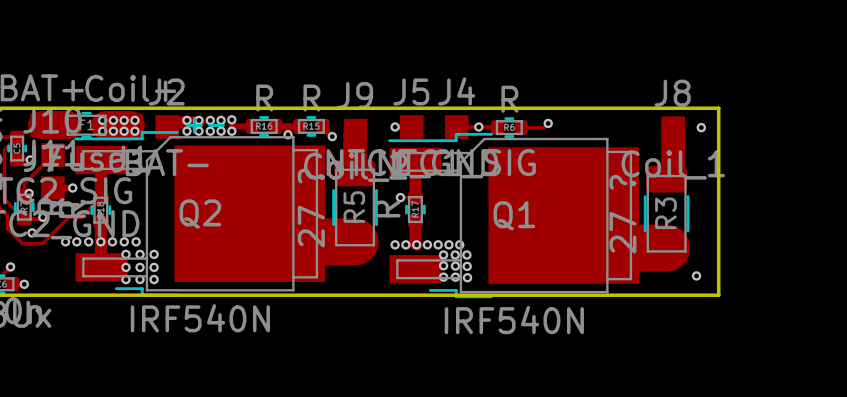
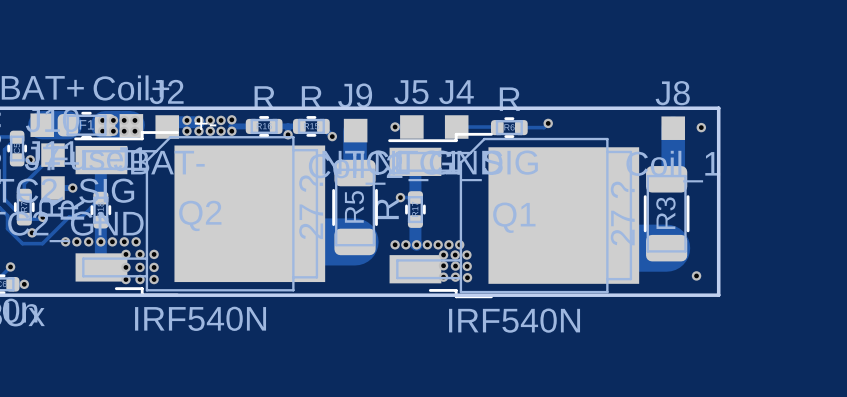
via: (478, 127) -> none
via: (29, 193) -> none

